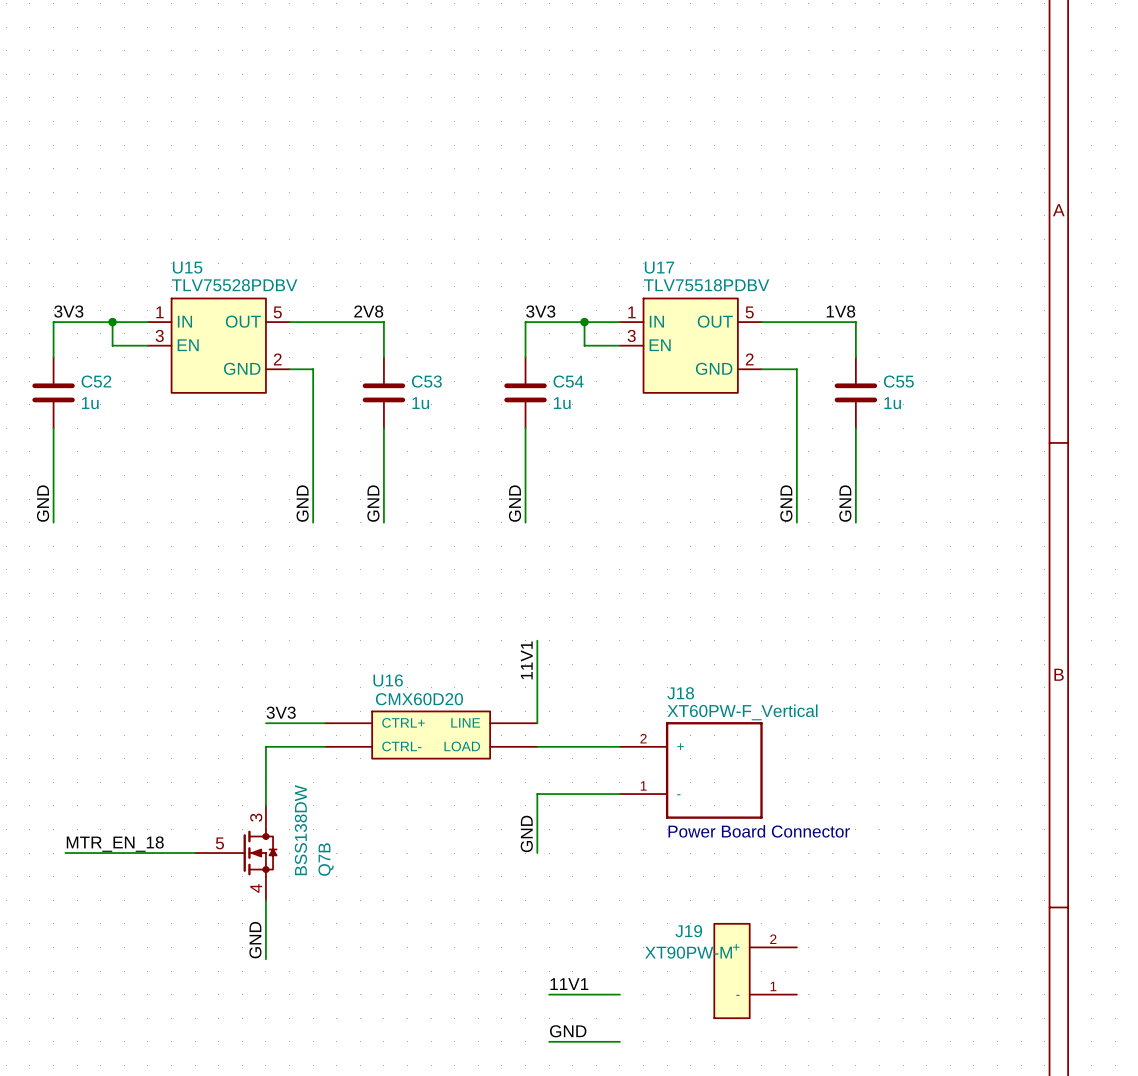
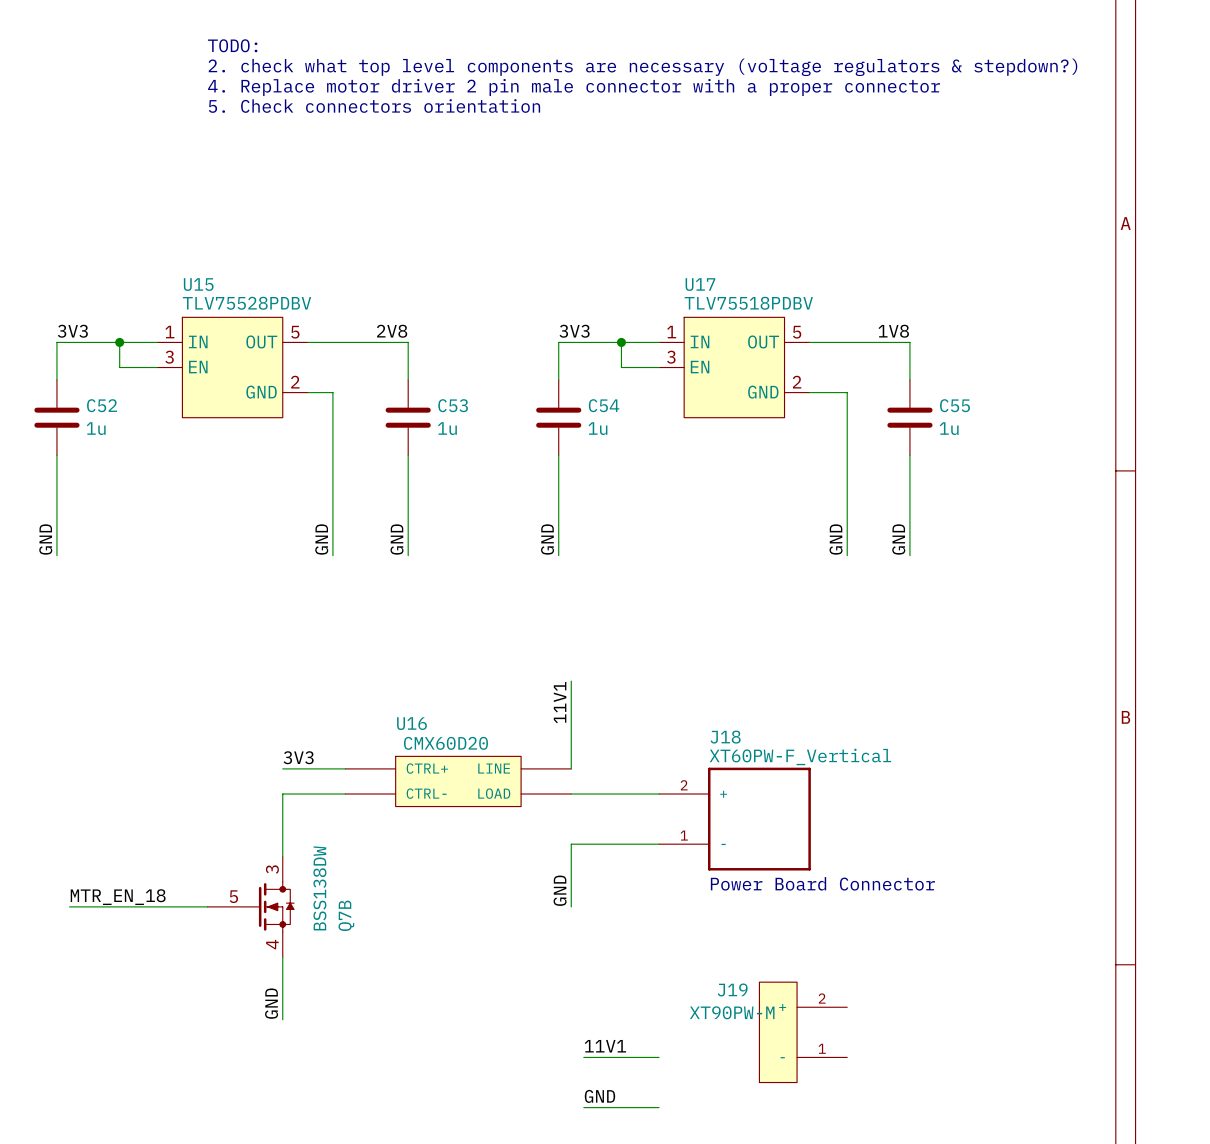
text: none -> TODO: (232, 45)
text: none -> 2. check what top level components are necessary (voltage regulators & stepdown?) (642, 67)
text: none -> 4. Replace motor driver 2 pin male connector with a proper connector (574, 87)
text: none -> 5. Check connectors orientation (374, 106)

